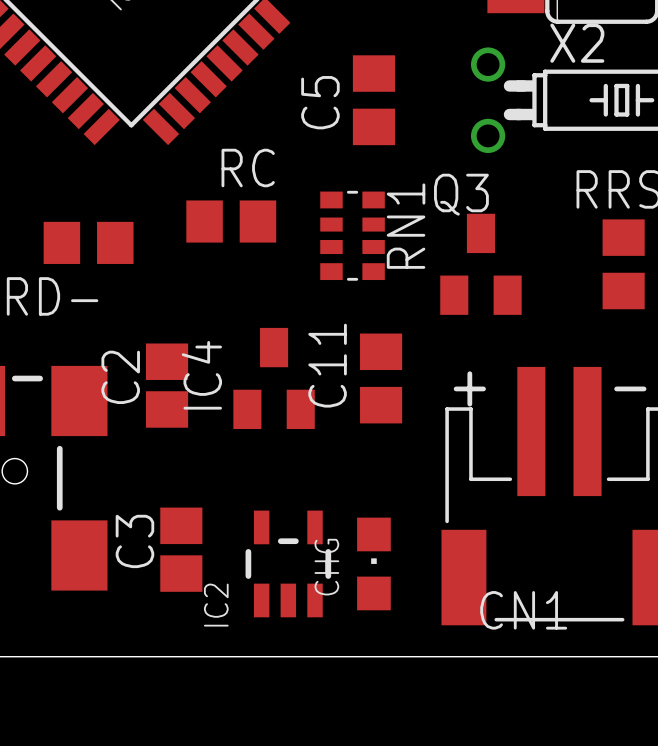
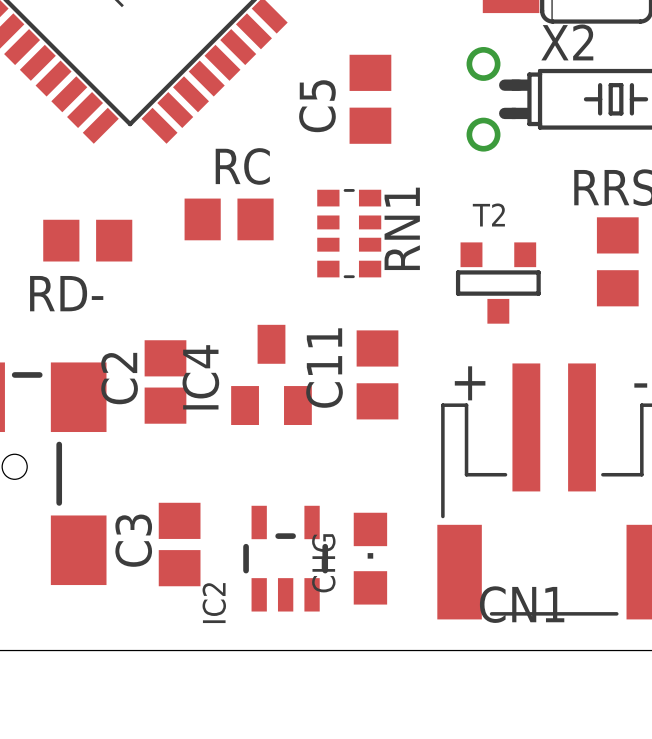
Q3: (480, 264) -> none
T2: none -> (498, 283)

